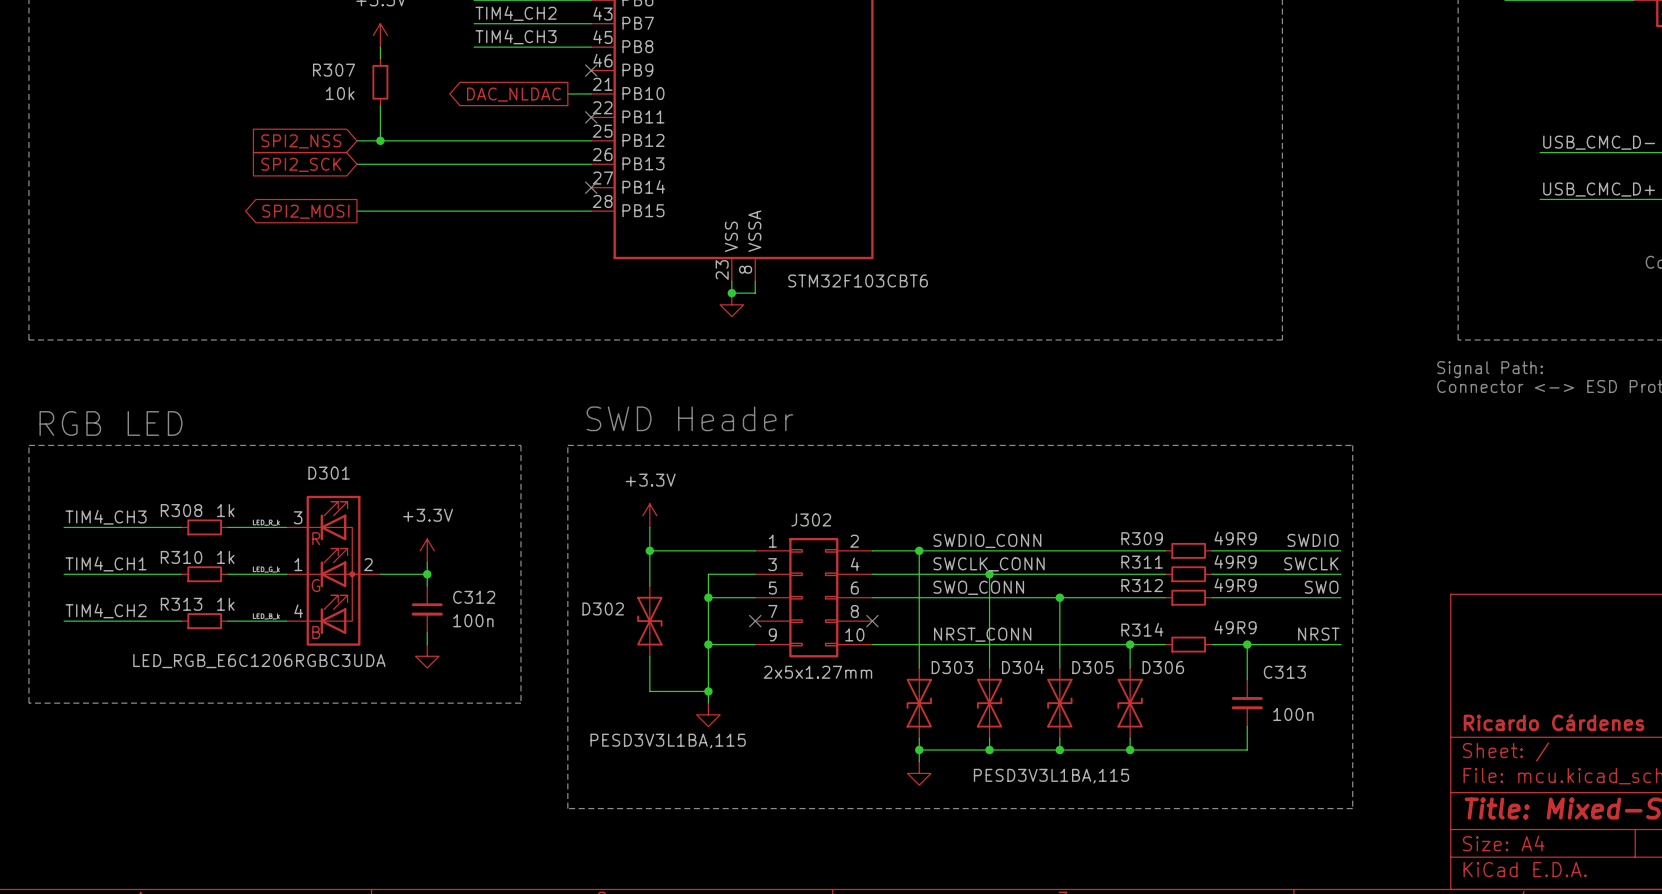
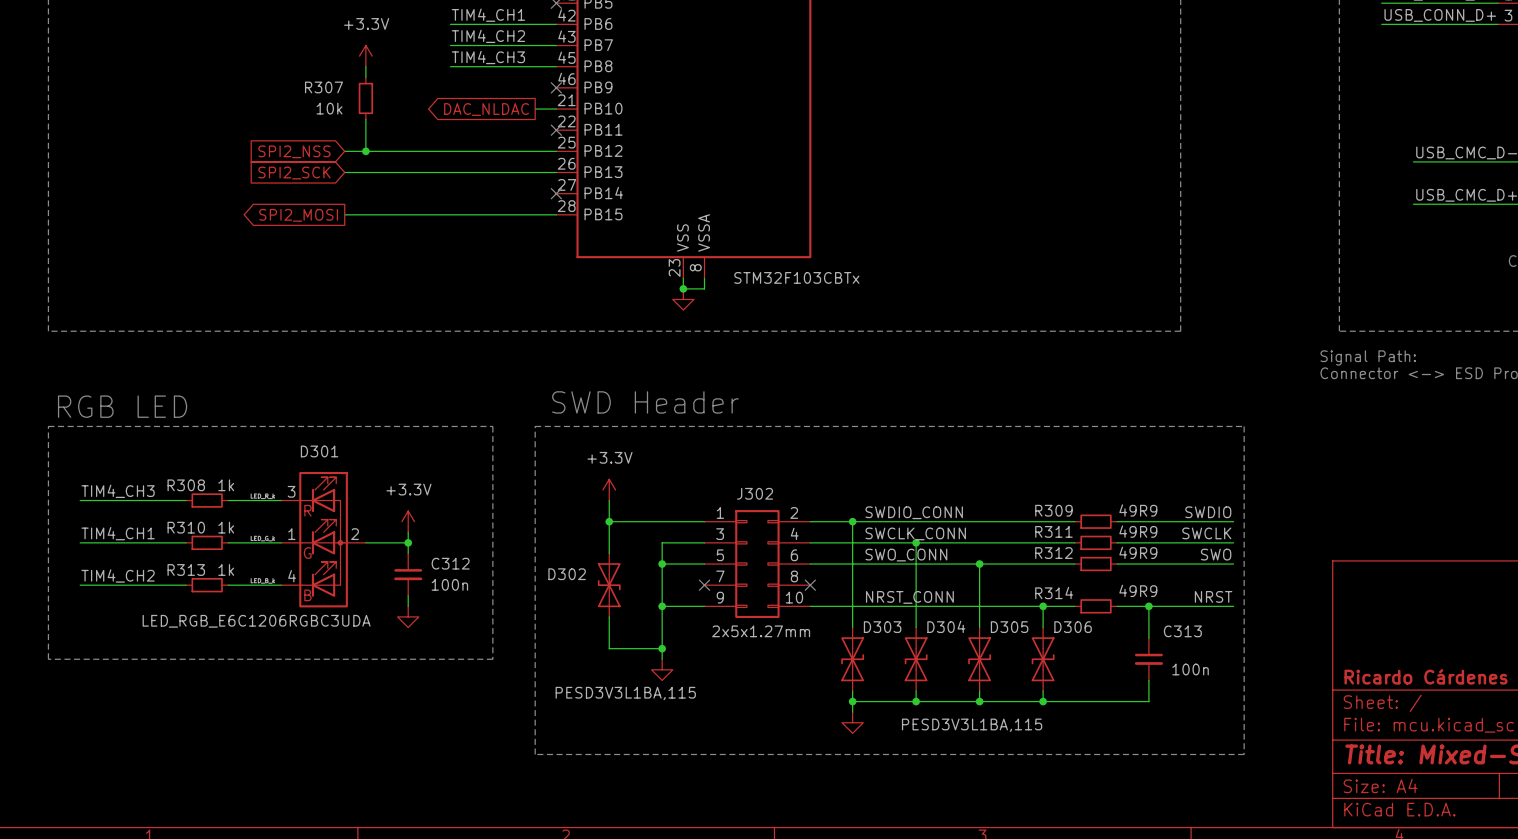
part value: STM32F103CBT6 (858, 280) -> STM32F103CBTx (796, 277)

